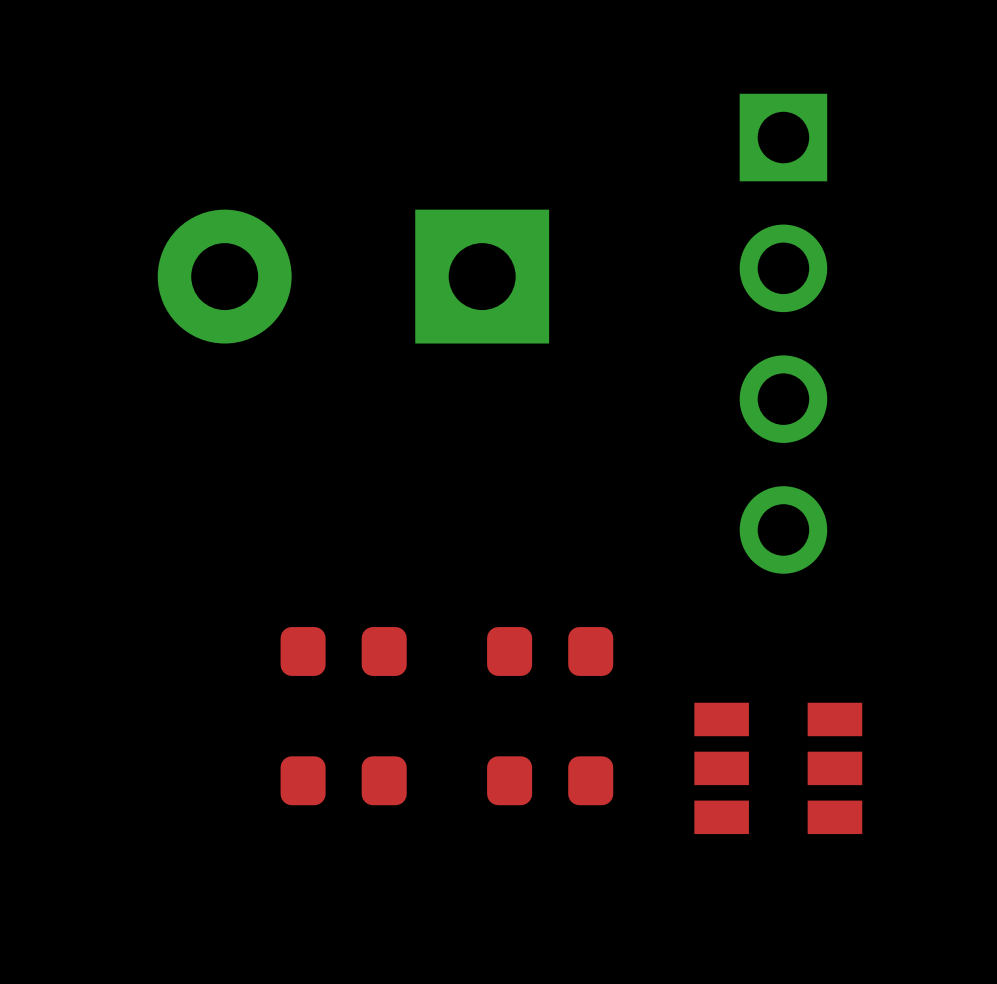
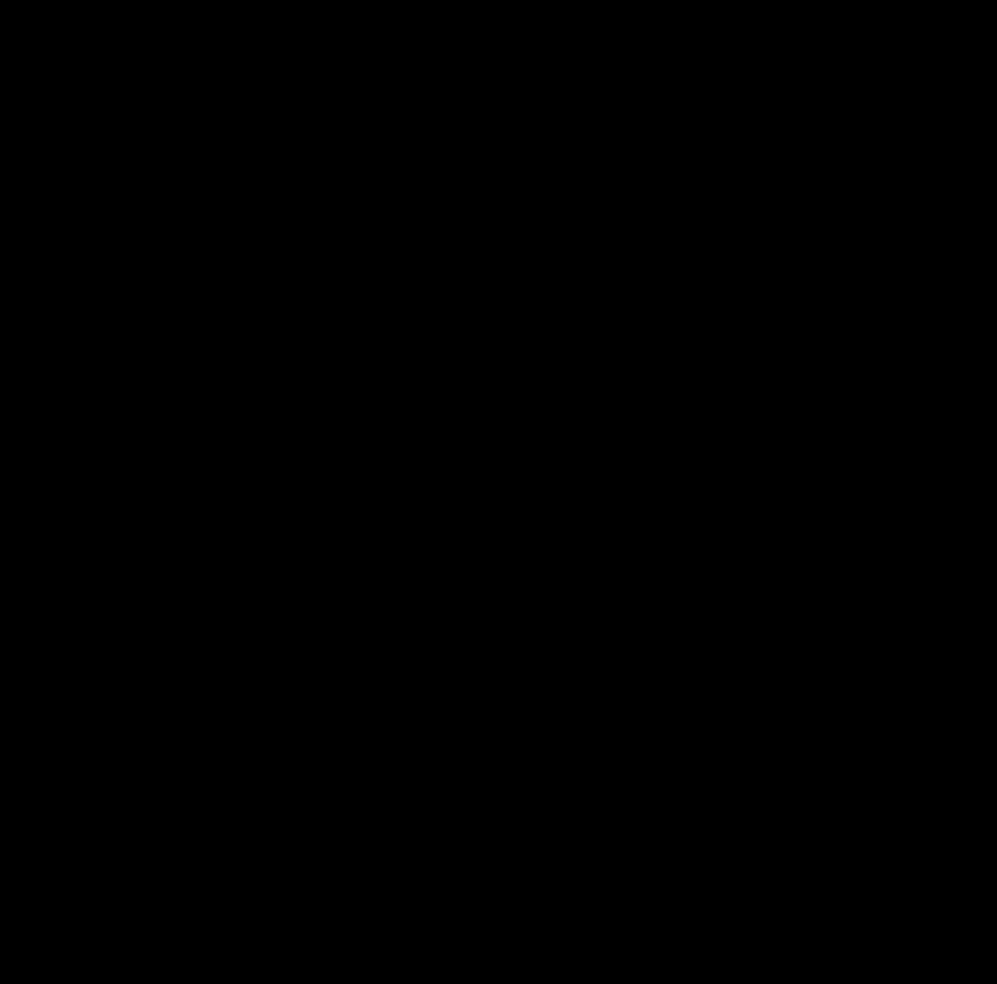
part: (353, 276) -> none
part: (783, 333) -> none
part: (343, 651) -> none
part: (550, 651) -> none
part: (778, 768) -> none
part: (343, 780) -> none
part: (550, 780) -> none

